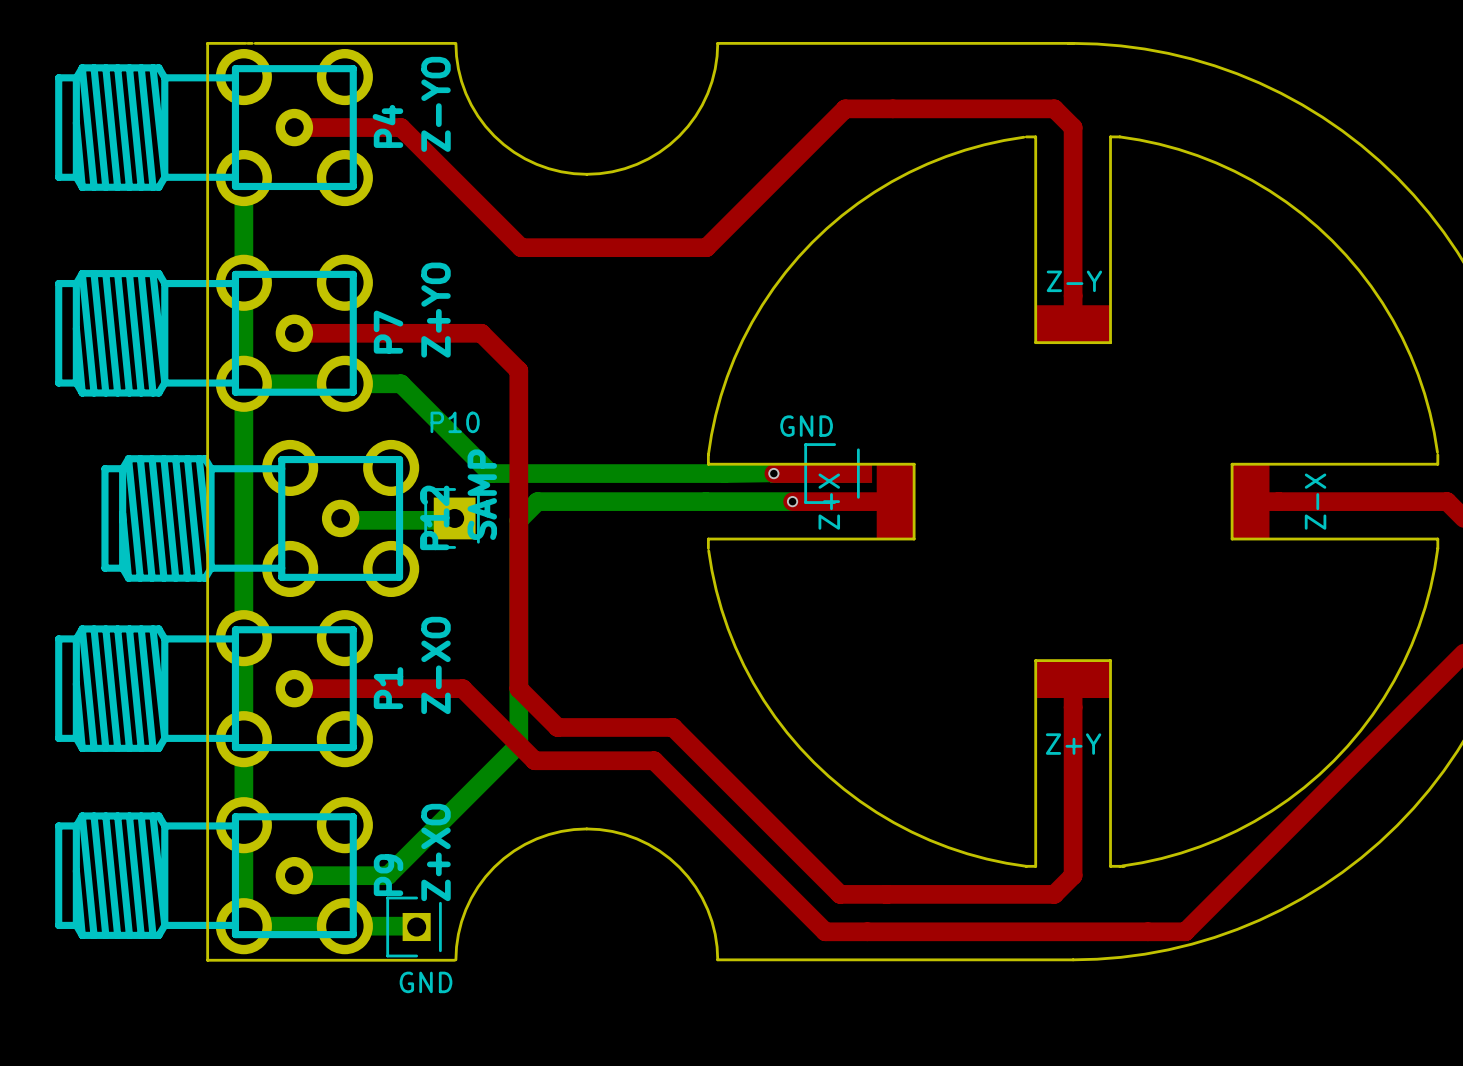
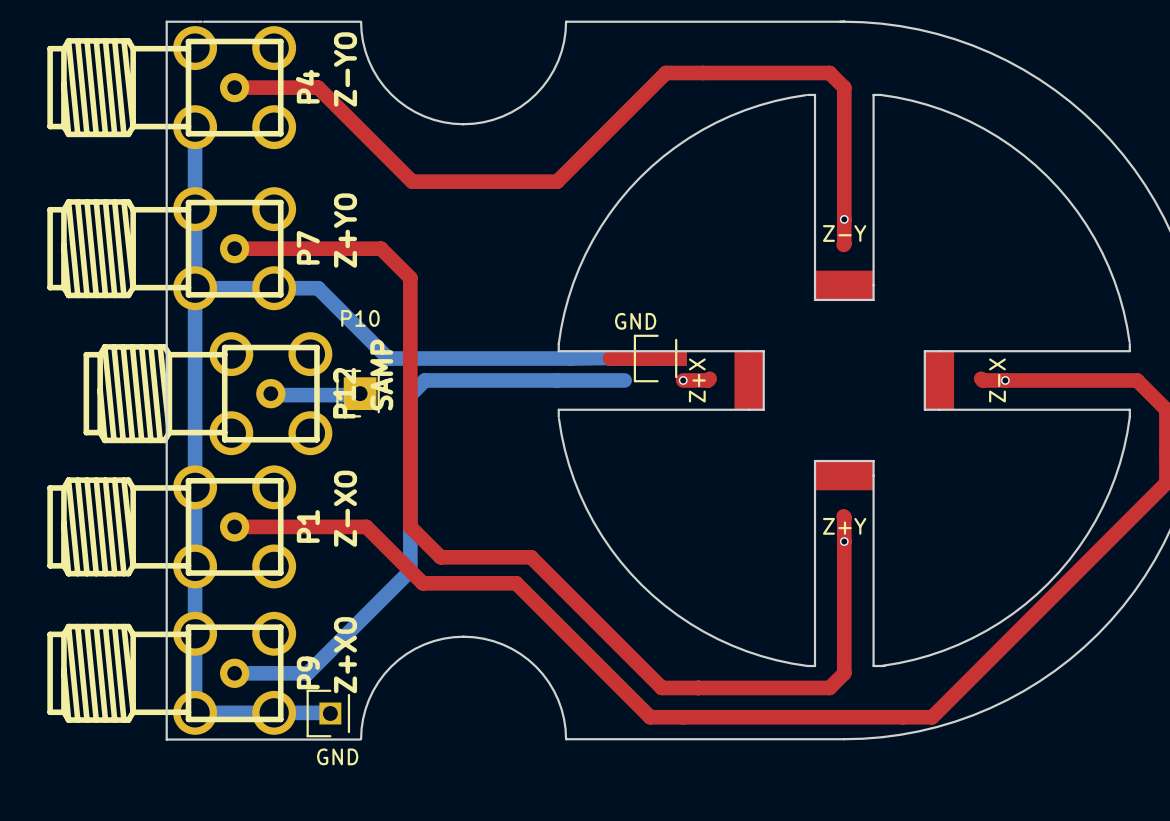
via: none -> (844, 219)
part: Z-Y (1073, 323) -> none
board edge: (1035, 342) (1110, 342) -> (815, 256) (815, 299) (873, 299) (873, 256)
part: none -> Z-Y (844, 285)
board edge: (914, 464) (914, 539) -> (719, 351) (763, 351) (763, 409) (719, 409)
board edge: (1232, 464) (1232, 539) -> (968, 351) (924, 351) (924, 409) (968, 409)
via: (773, 473) -> none
top track: (792, 501) (867, 501) -> none
via: (792, 501) -> none
via: none -> (683, 380)
part: Z+X (895, 501) -> none
part: none -> Z+X (749, 380)
part: none -> Z-X (939, 380)
part: Z-X (1250, 501) -> none
via: none -> (1005, 380)
part: none -> Z+Y (844, 475)
board edge: (1035, 660) (1110, 660) -> (815, 504) (815, 461) (873, 461) (873, 504)
part: Z+Y (1073, 679) -> none
via: none -> (844, 541)

